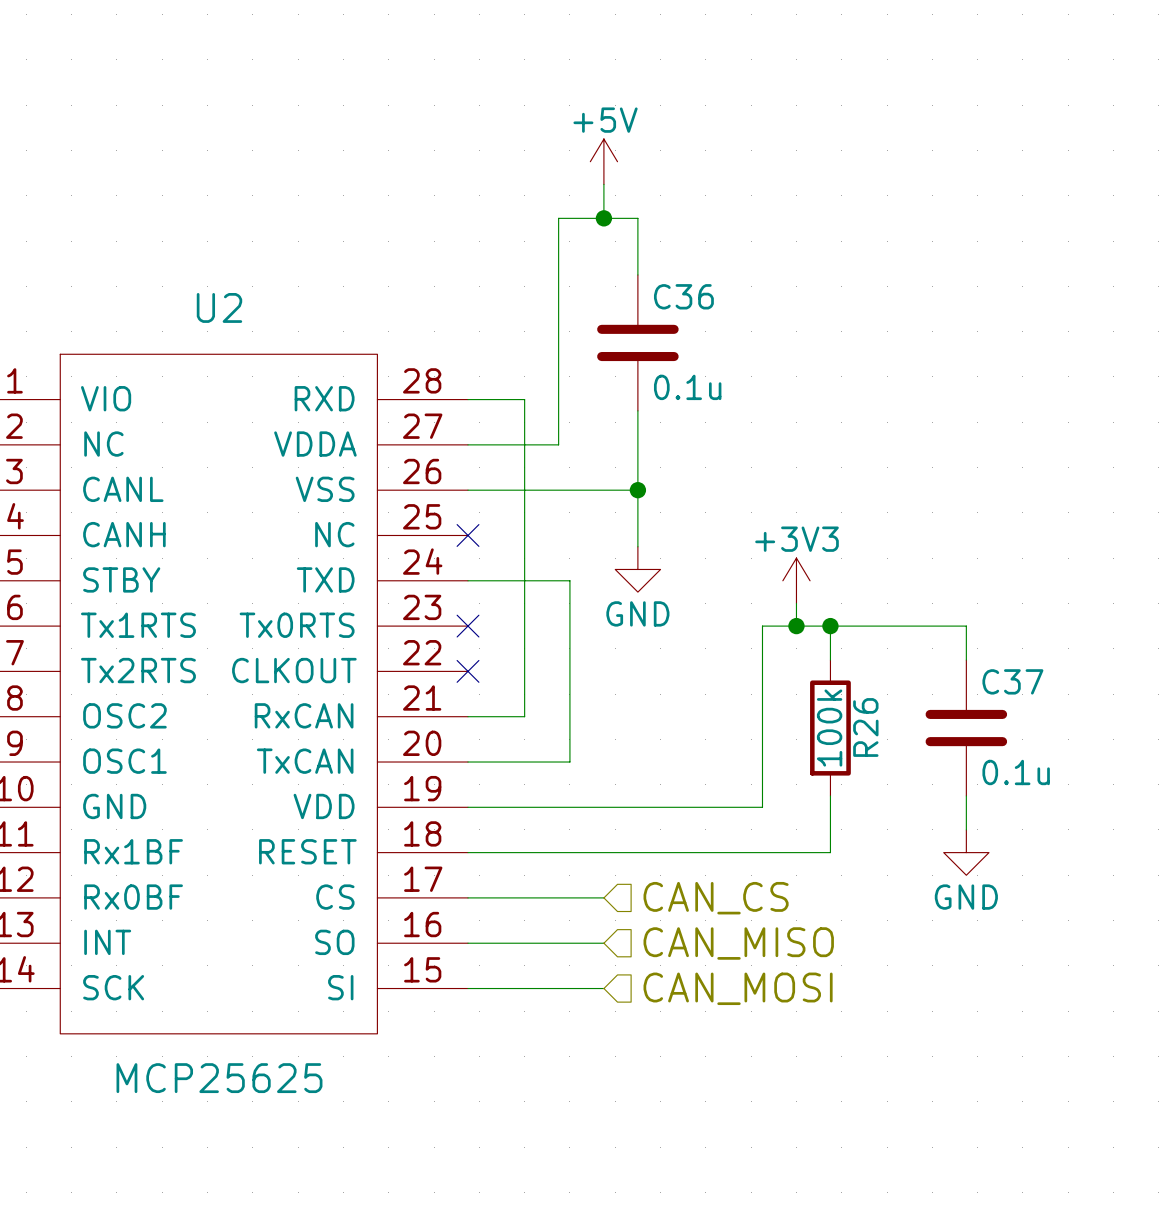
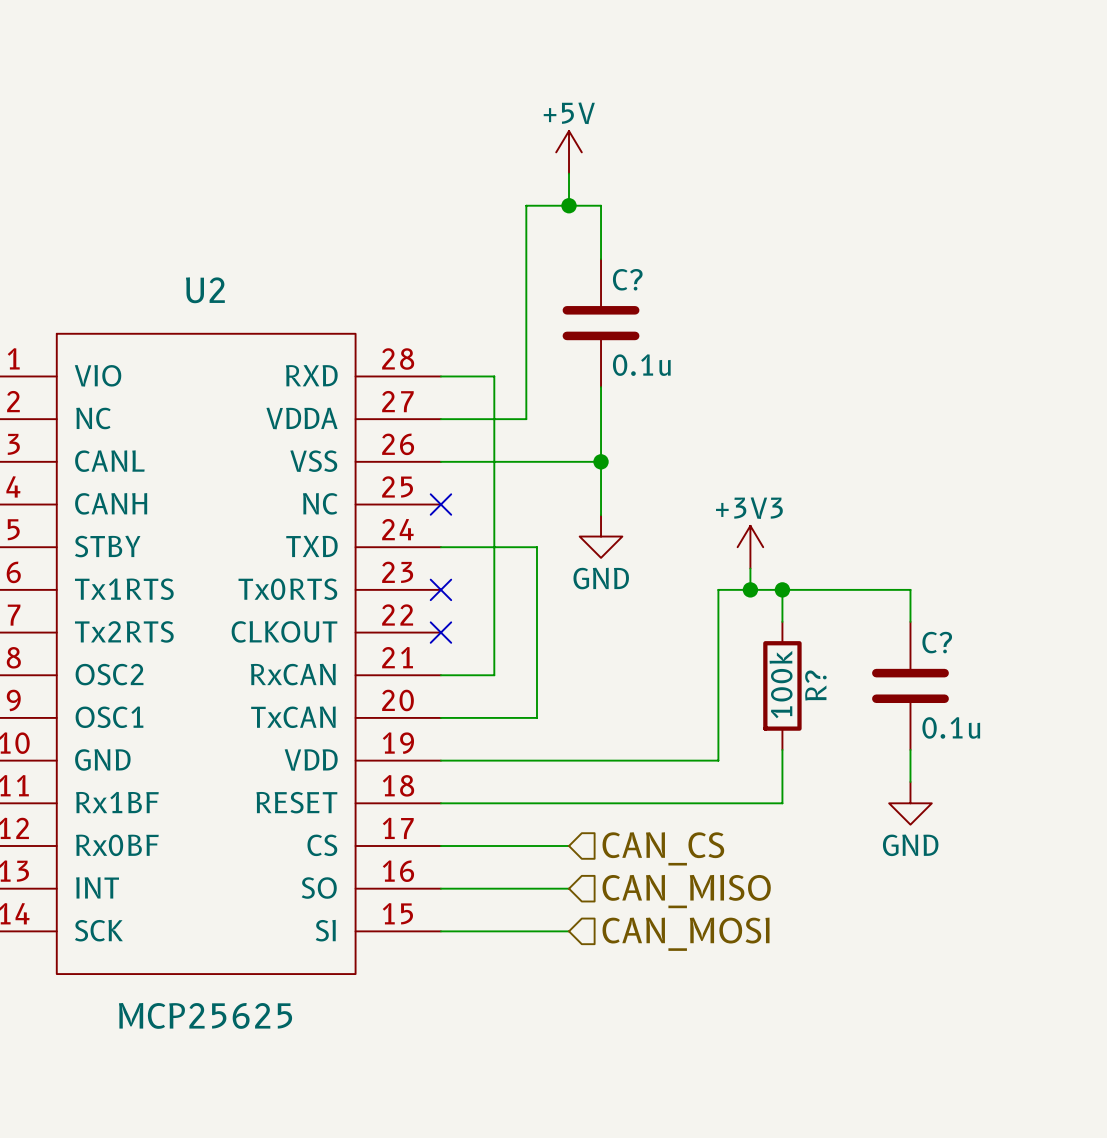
C36 name: C36 (683, 296) -> C? (627, 279)
C37 name: C37 (1012, 681) -> C? (937, 642)
R26 name: R26 (865, 727) -> R? (815, 685)

